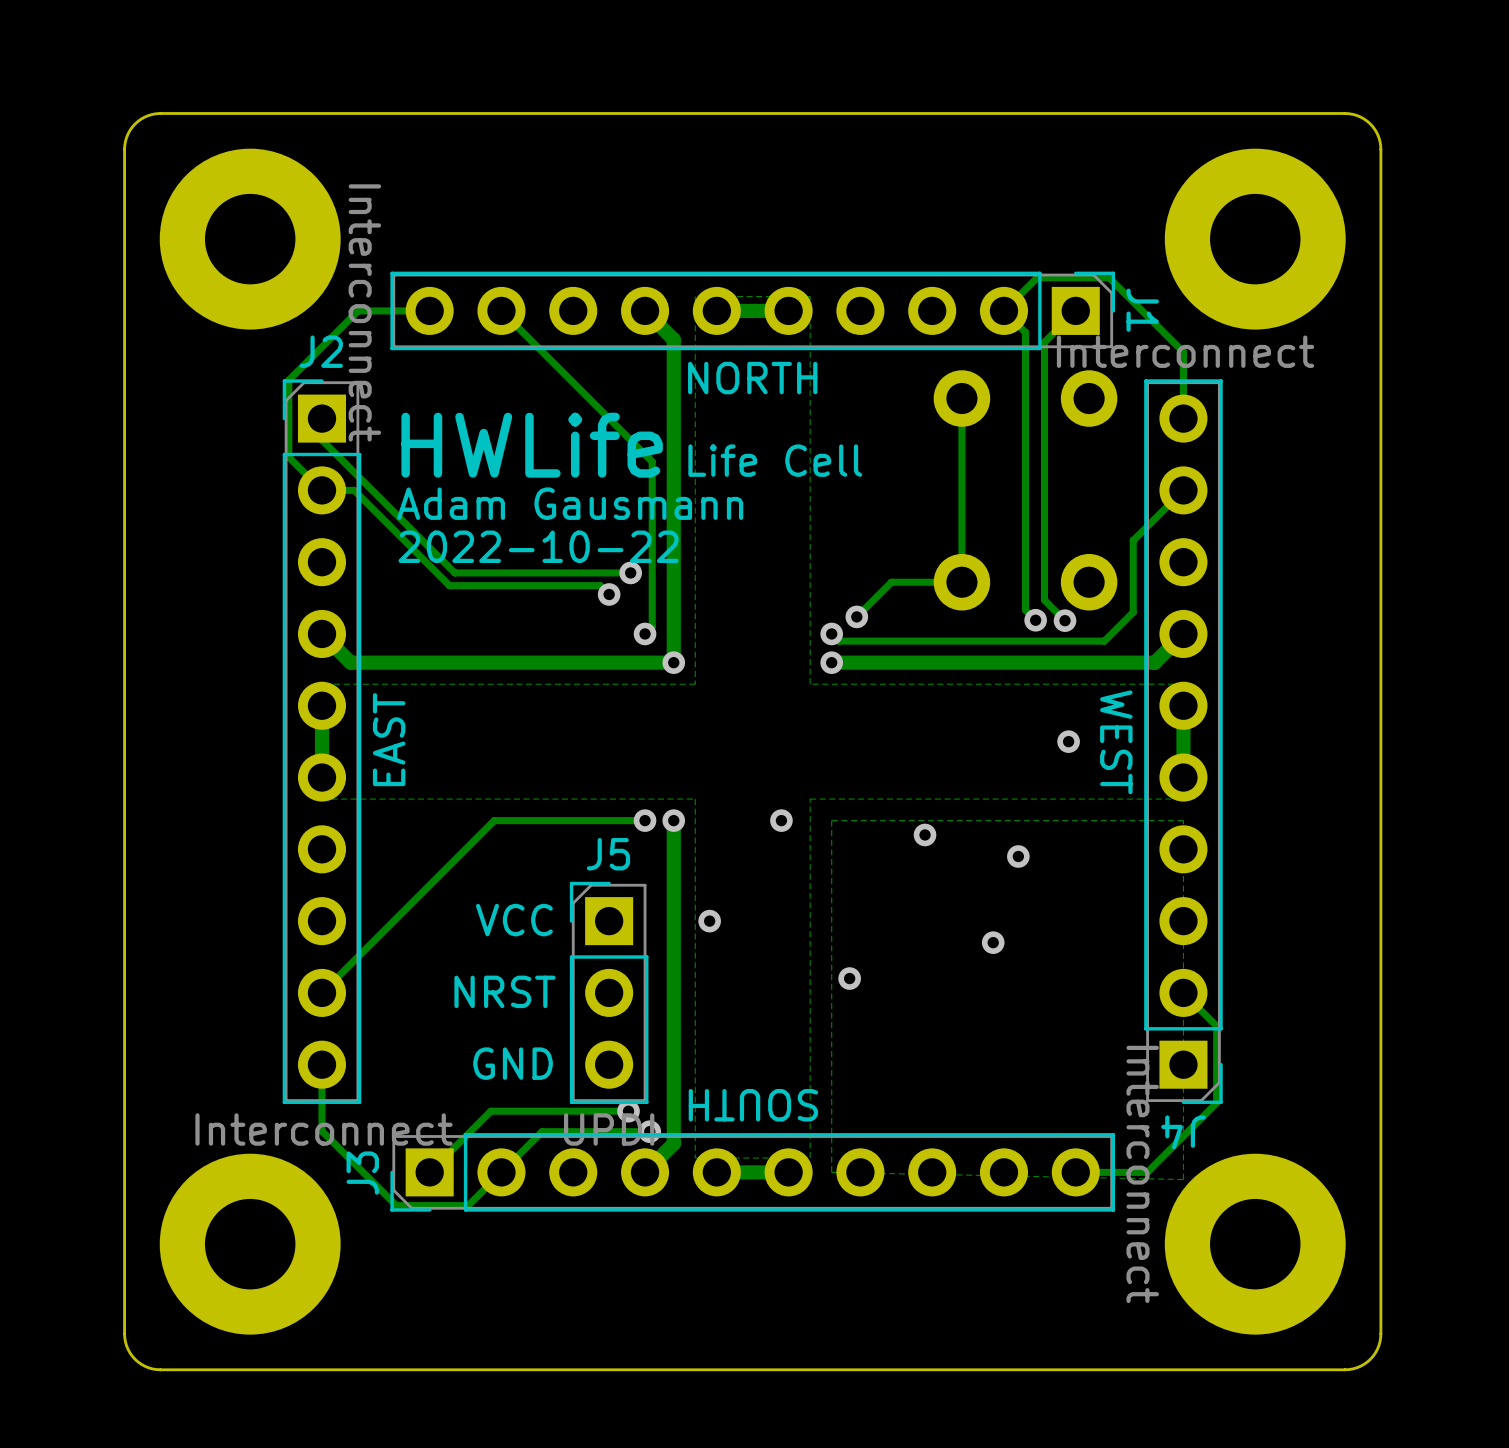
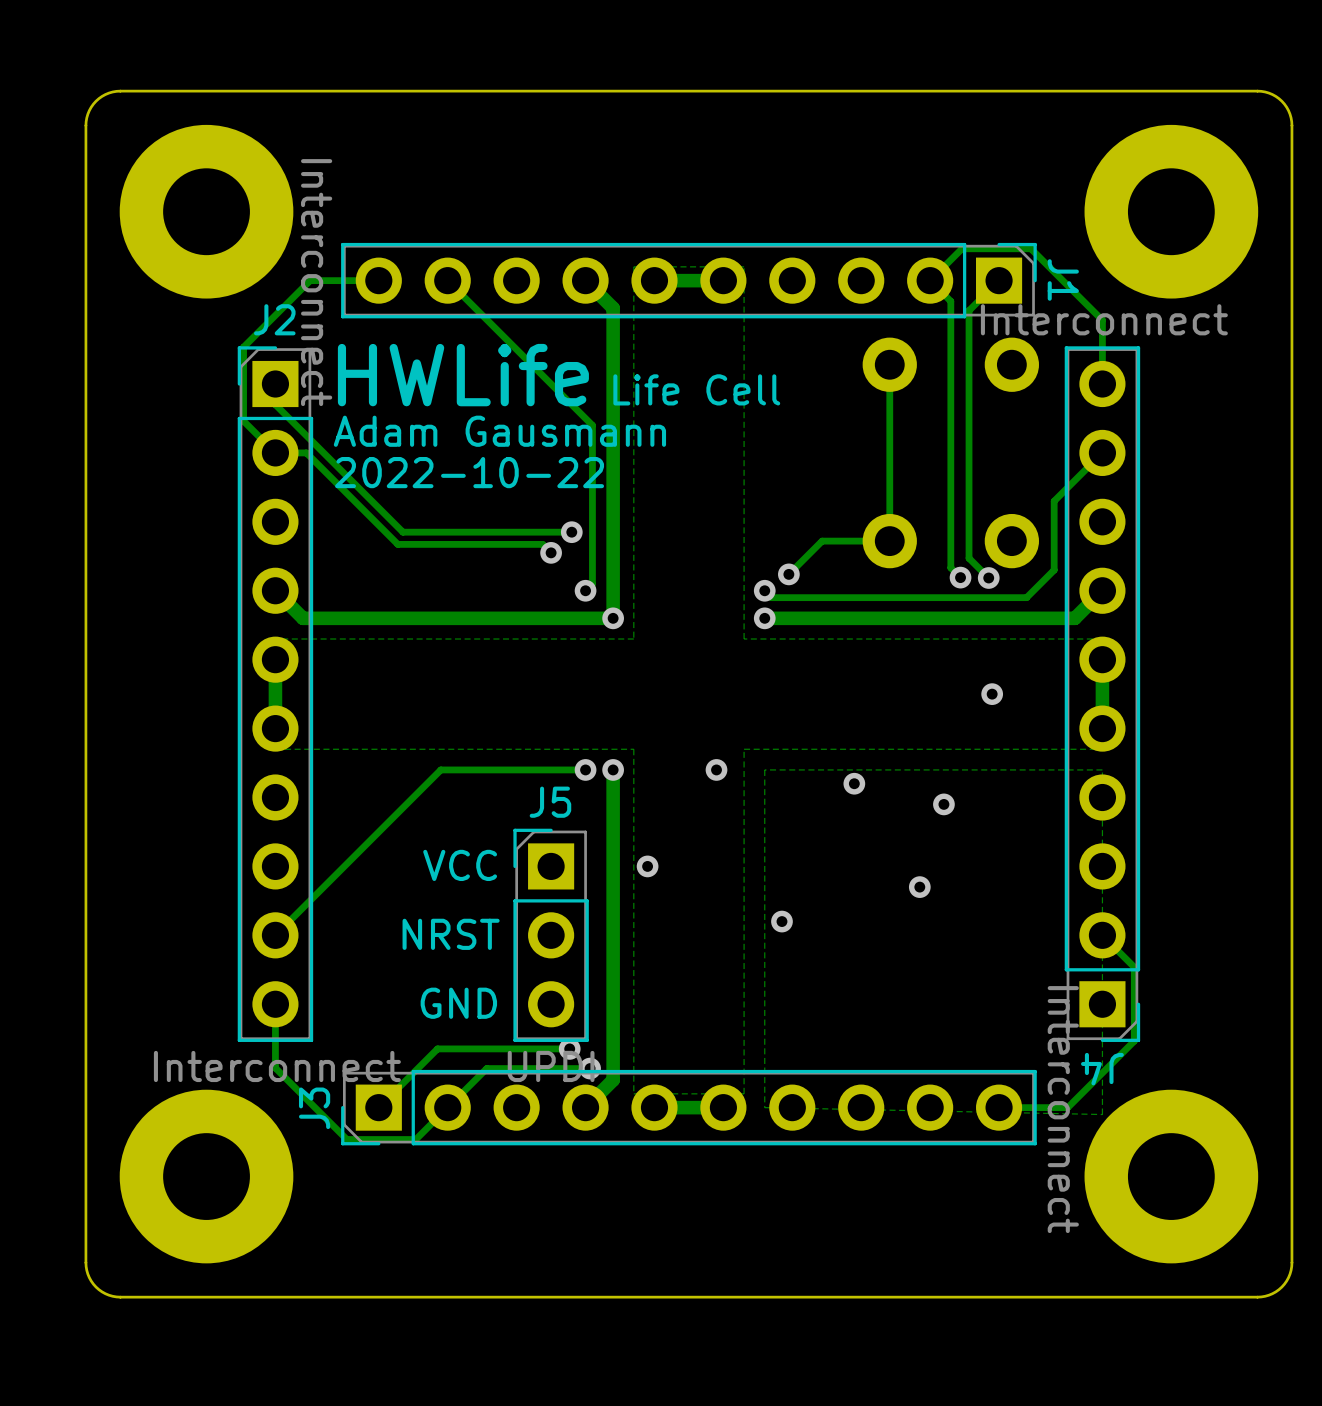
text: NORTH (752, 378) -> none
text position: HWLife (532, 445) -> HWLife (463, 375)
text position: Life Cell (775, 460) -> Life Cell (696, 389)
text: none -> Adam Gausmann (499, 431)
text: Adam Gausmann (570, 503) -> 2022-10-22 (469, 472)
text: 2022-10-22 (538, 546) -> none
text: EAST (389, 739) -> none
text: WEST (1116, 742) -> none
text: SOUTH (753, 1105) -> none

